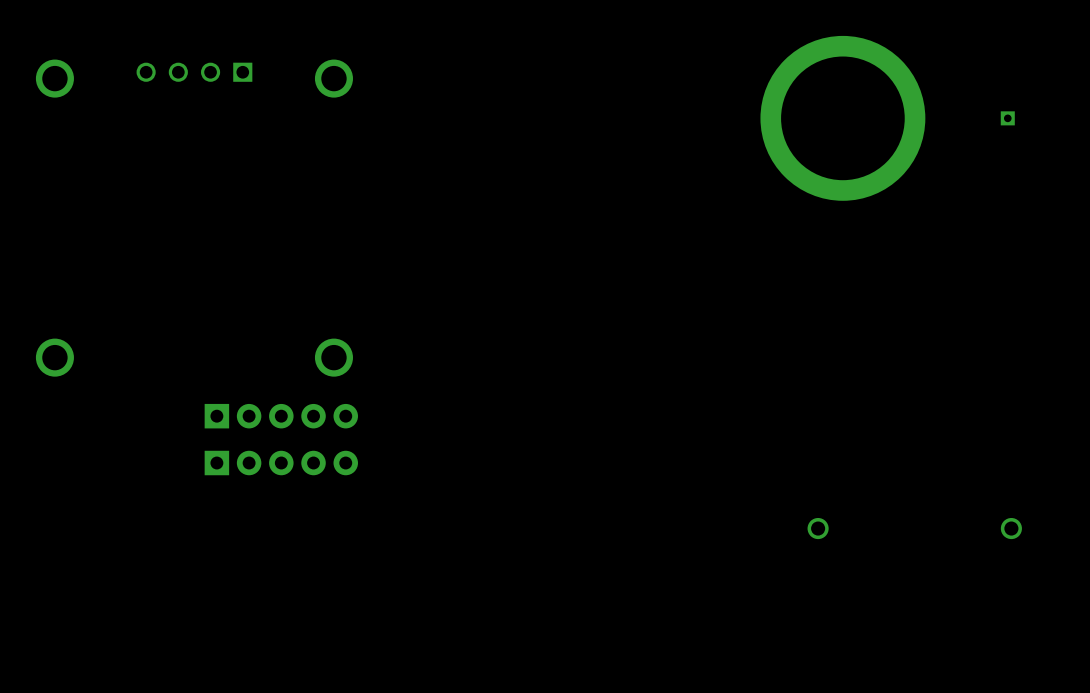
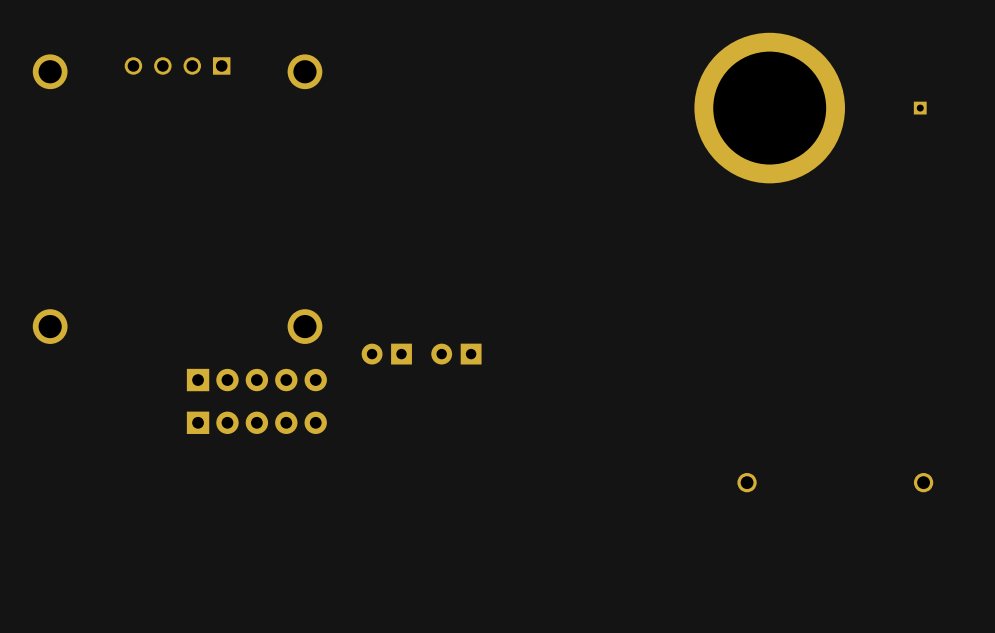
part: none -> (386, 354)
part: none -> (456, 354)

